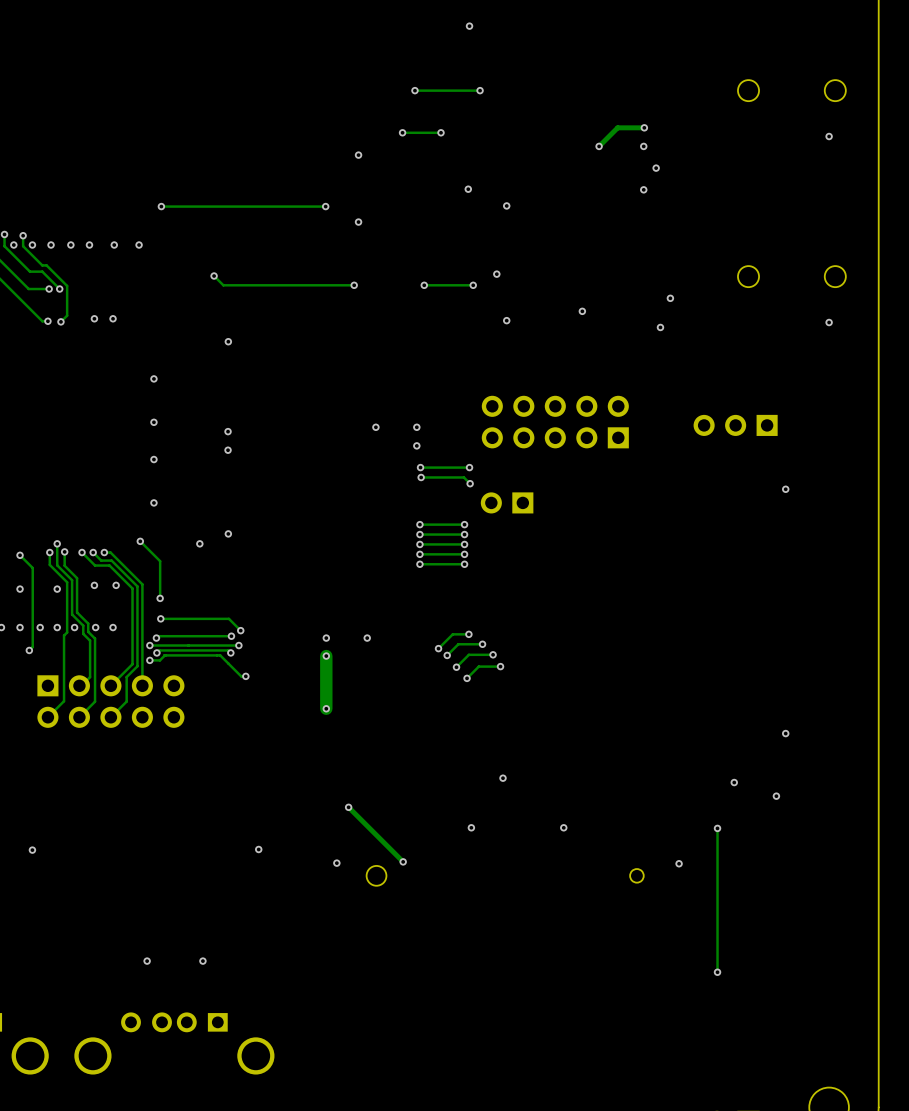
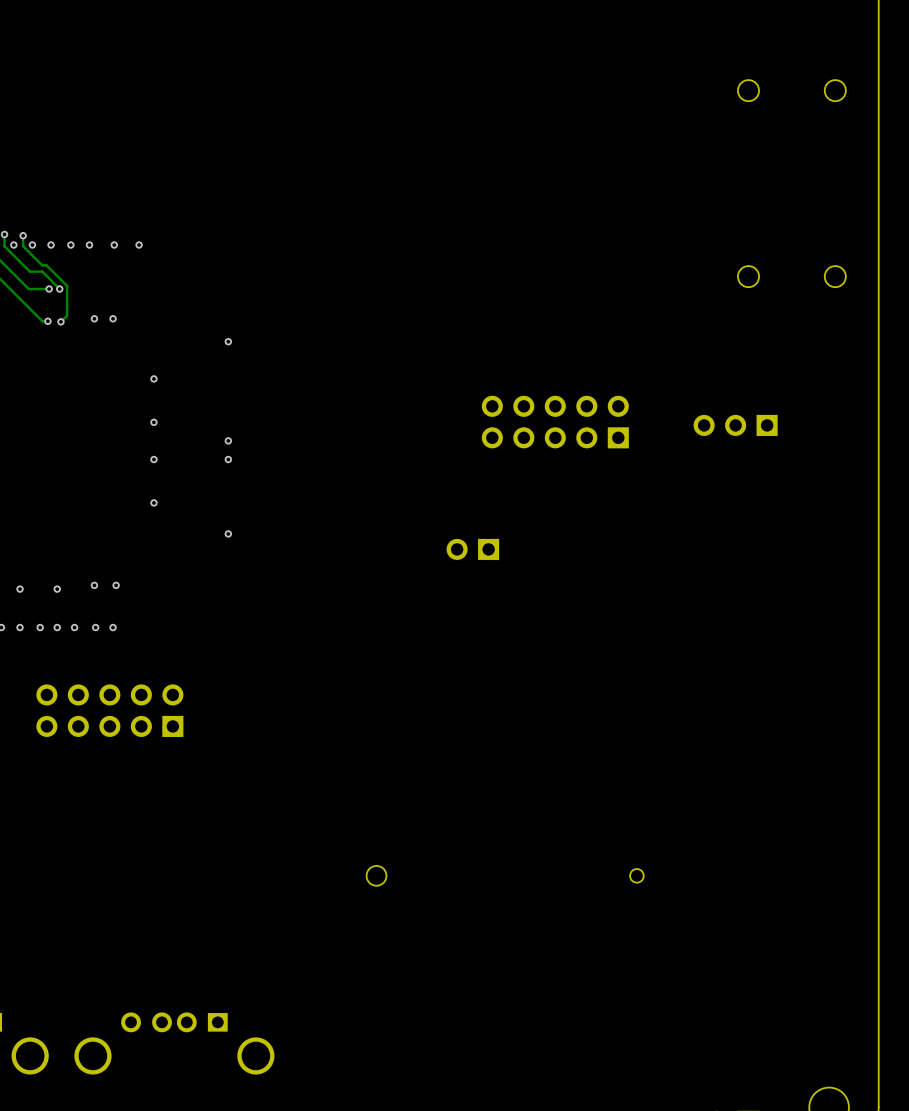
via: (469, 26) -> none
via: (414, 90) -> none
track: (480, 90) (414, 90) -> none
via: (480, 90) -> none
track: (644, 127) (617, 127) (599, 146) -> none
via: (644, 127) -> none
via: (402, 132) -> none
track: (441, 132) (402, 132) -> none
via: (441, 132) -> none
via: (829, 136) -> none
via: (599, 146) -> none
via: (643, 146) -> none
via: (358, 155) -> none
via: (656, 168) -> none
via: (468, 189) -> none
via: (643, 189) -> none
via: (506, 205) -> none
via: (161, 206) -> none
track: (325, 206) (161, 206) -> none
via: (325, 206) -> none
via: (358, 222) -> none
via: (496, 274) -> none
track: (214, 276) (223, 285) (354, 285) -> none
via: (214, 276) -> none
via: (354, 285) -> none
via: (424, 285) -> none
track: (473, 285) (424, 285) -> none
via: (473, 285) -> none
via: (670, 298) -> none
via: (582, 311) -> none
via: (506, 320) -> none
via: (829, 322) -> none
via: (660, 327) -> none
via: (375, 427) -> none
via: (416, 427) -> none
via: (228, 431) -> none
via: none -> (228, 440)
via: (416, 445) -> none
via: (228, 450) -> none
via: none -> (228, 459)
via: (420, 467) -> none
track: (469, 467) (420, 467) -> none
via: (469, 467) -> none
track: (421, 477) (463, 477) (470, 483) -> none
via: (421, 477) -> none
via: (470, 483) -> none
via: (785, 489) -> none
part position: (507, 502) -> (472, 549)
via: (419, 524) -> none
track: (464, 524) (419, 524) -> none
via: (464, 524) -> none
via: (419, 534) -> none
track: (464, 534) (419, 534) -> none
via: (464, 534) -> none
track: (140, 541) (160, 561) (160, 598) -> none
via: (140, 541) -> none
track: (57, 543) (57, 565) (72, 580) (72, 614) (83, 625) (83, 633) (90, 640) (90, 677) (79, 685) -> none
via: (57, 543) -> none
via: (199, 543) -> none
via: (419, 544) -> none
track: (464, 544) (419, 544) -> none
via: (464, 544) -> none
track: (64, 551) (64, 565) (77, 578) (77, 612) (88, 623) (88, 631) (95, 638) (95, 701) (79, 717) -> none
via: (64, 551) -> none
track: (49, 552) (49, 564) (67, 582) (67, 632) (64, 635) (64, 701) (47, 717) -> none
via: (49, 552) -> none
track: (82, 552) (95, 565) (109, 565) (132, 588) (132, 664) (110, 685) -> none
via: (82, 552) -> none
track: (93, 552) (101, 560) (111, 560) (137, 586) (137, 666) (126, 677) (126, 701) (110, 717) -> none
via: (93, 552) -> none
track: (104, 552) (110, 552) (142, 584) (142, 685) -> none
via: (104, 552) -> none
via: (419, 554) -> none
track: (464, 554) (419, 554) -> none
via: (464, 554) -> none
track: (20, 555) (32, 568) (32, 647) (29, 650) -> none
via: (20, 555) -> none
via: (419, 564) -> none
track: (464, 564) (419, 564) -> none
via: (464, 564) -> none
via: (160, 598) -> none
track: (160, 618) (228, 618) (240, 630) -> none
via: (160, 618) -> none
via: (240, 630) -> none
track: (468, 634) (452, 634) (438, 648) -> none
via: (468, 634) -> none
track: (231, 636) (158, 636) (156, 638) -> none
via: (231, 636) -> none
via: (156, 638) -> none
via: (326, 638) -> none
via: (367, 638) -> none
track: (482, 644) (458, 644) (447, 655) -> none
via: (482, 644) -> none
via: (149, 645) -> none
track: (238, 645) (149, 645) -> none
via: (238, 645) -> none
via: (438, 648) -> none
via: (29, 650) -> none
via: (156, 652) -> none
track: (230, 652) (228, 650) (159, 650) (156, 652) -> none
via: (230, 652) -> none
track: (493, 654) (468, 654) (456, 667) -> none
via: (493, 654) -> none
via: (447, 655) -> none
track: (326, 656) (326, 708) -> none
via: (326, 656) -> none
track: (149, 660) (159, 660) (164, 655) (220, 655) (241, 676) (245, 676) -> none
via: (149, 660) -> none
track: (500, 666) (478, 666) (467, 678) -> none
via: (500, 666) -> none
via: (456, 667) -> none
via: (245, 676) -> none
via: (467, 678) -> none
part rotation: 0° (110, 701) -> 180° (109, 710)
via: (326, 708) -> none
via: (785, 733) -> none
via: (503, 778) -> none
via: (734, 782) -> none
via: (776, 796) -> none
track: (348, 807) (403, 861) -> none
via: (348, 807) -> none
via: (471, 827) -> none
via: (563, 827) -> none
track: (717, 828) (717, 972) -> none
via: (717, 828) -> none
via: (258, 849) -> none
via: (32, 850) -> none
via: (403, 861) -> none
via: (336, 863) -> none
via: (679, 863) -> none
via: (147, 961) -> none
via: (202, 961) -> none
via: (717, 972) -> none

